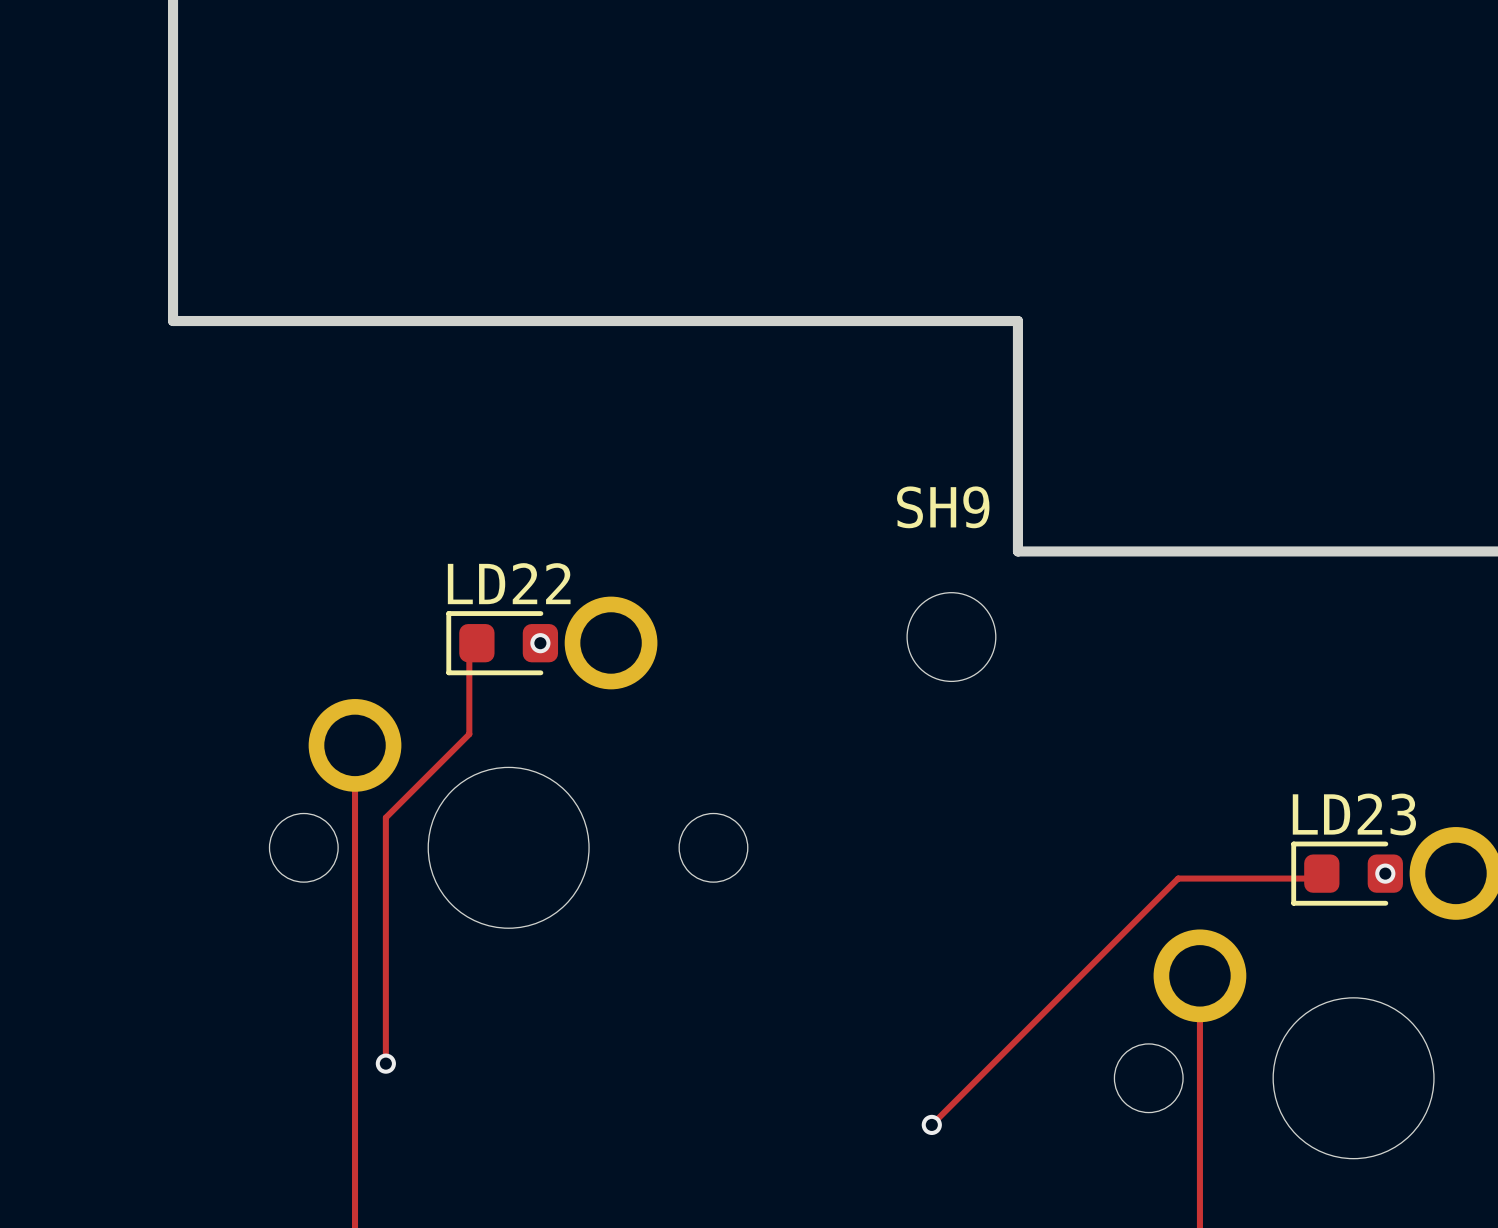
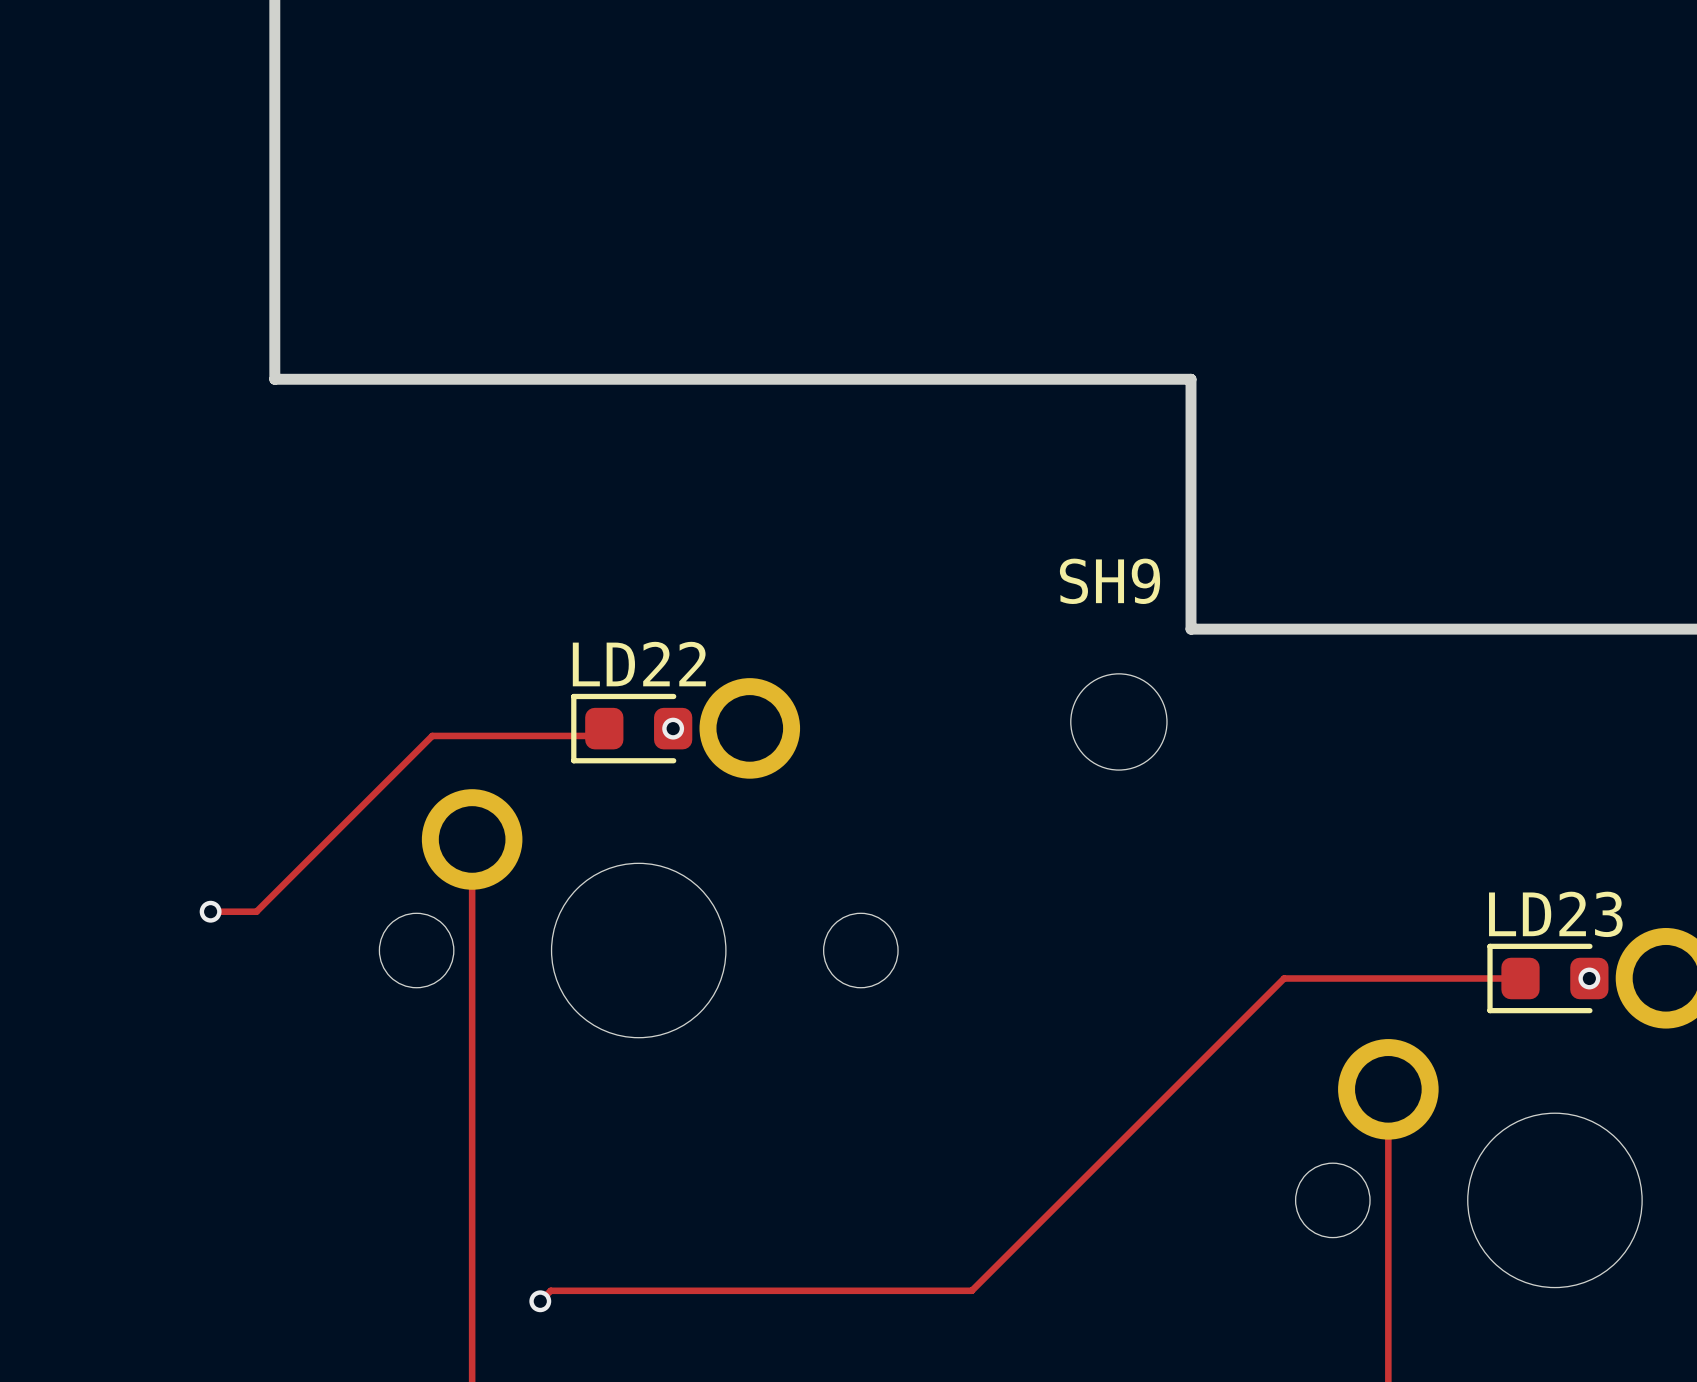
track: (470, 649) (469, 734) (385, 817) (385, 1063) -> (596, 735) (432, 735) (256, 911) (210, 911)
via: none -> (210, 911)
track: (1321, 873) (1316, 878) (1178, 878) (931, 1124) -> (1520, 978) (1284, 978) (971, 1290) (550, 1290) (540, 1301)
via position: (385, 1063) -> (540, 1301)
via: (931, 1124) -> none

